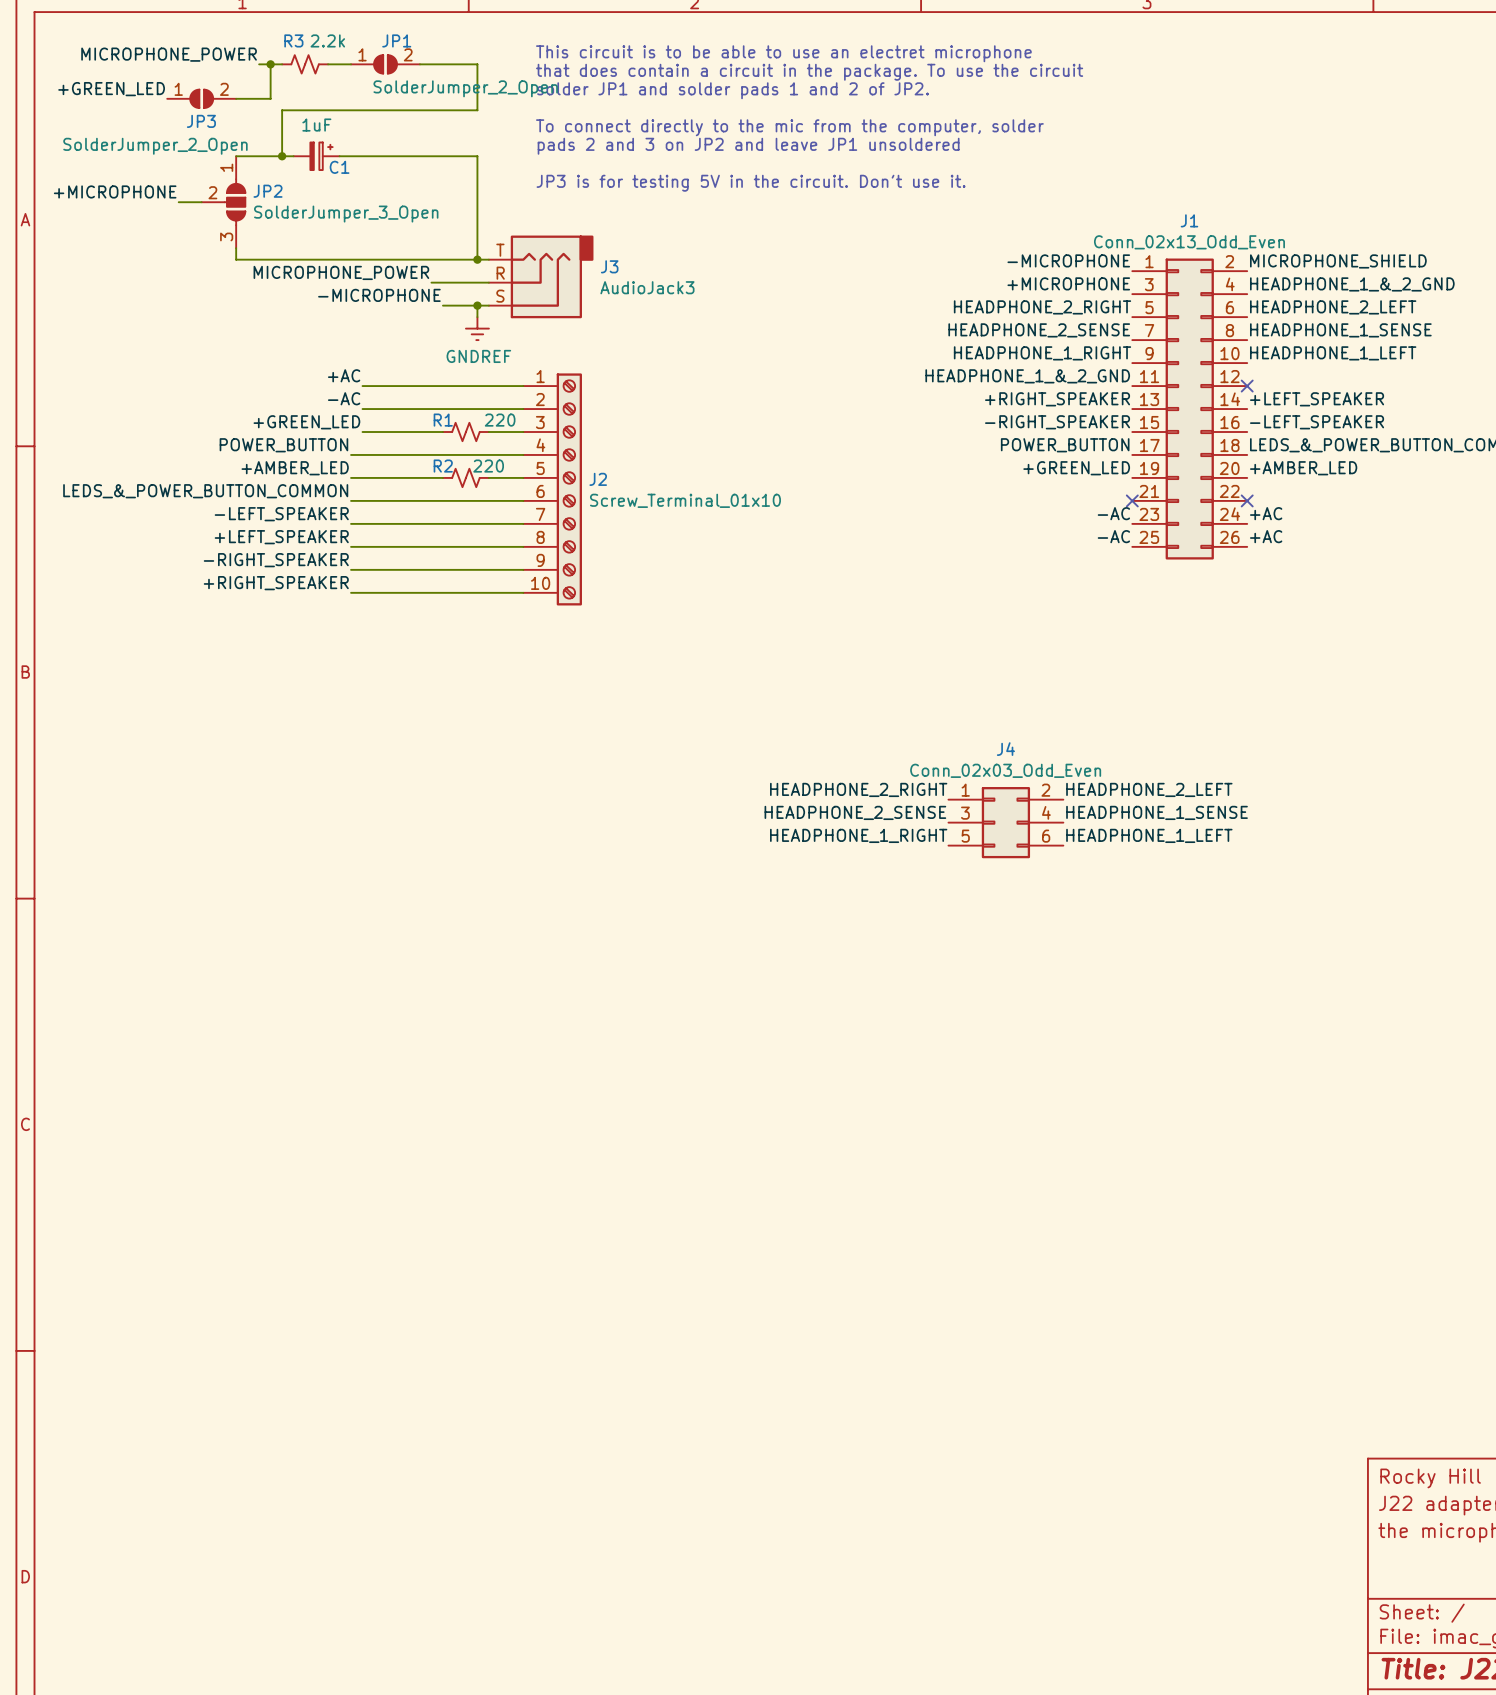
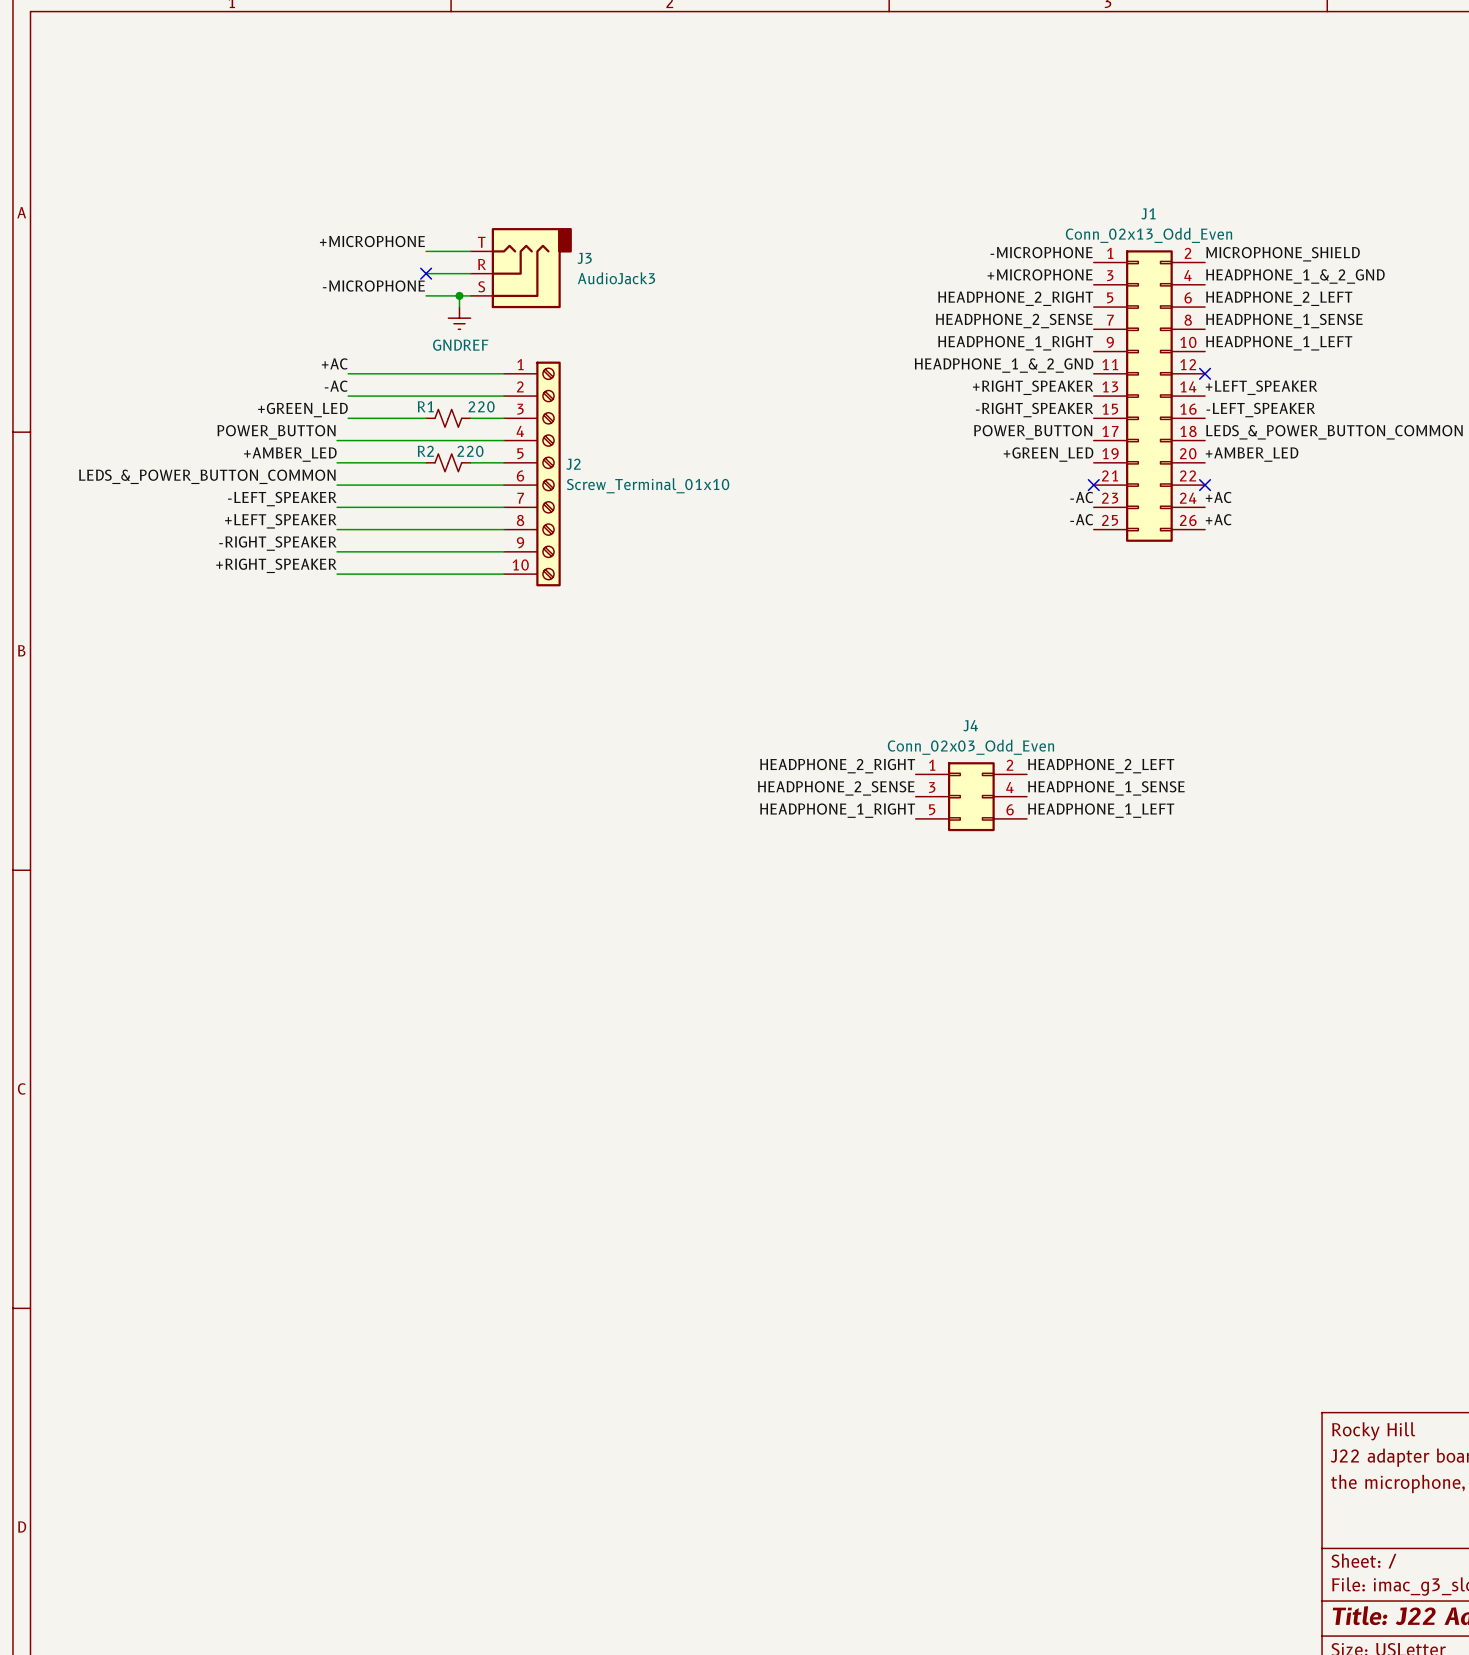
text: This circuit is to be able to use an electret microphone (783, 53) -> none
label: MICROPHONE_POWER (169, 54) -> none
wire: (259, 64) (282, 64) -> none
wire: (270, 64) (270, 98) (236, 98) -> none
junction: (270, 64) -> none
R3: 2.2k (305, 64) -> none
wire: (328, 64) (351, 64) -> none
JP1: SolderJumper_2_Open (385, 64) -> none
wire: (419, 64) (477, 64) (477, 110) (282, 110) (282, 156) -> none
text: that does contain a circuit in the package. To use the circuit (809, 72) -> none
label: +GREEN_LED (111, 89) -> none
text: solder JP1 and solder pads 1 and 2 of JP2. (733, 90) -> none
JP3: SolderJumper_2_Open (201, 98) -> none
text: To connect directly to the mic from the computer, solder (789, 127) -> none
text: pads 2 and 3 on JP2 and leave JP1 unsoldered (748, 146) -> none
wire: (236, 156) (293, 156) -> none
junction: (282, 156) -> none
C1: 1uF (316, 156) -> none
wire: (339, 156) (477, 156) (477, 259) -> none
text: JP3 is for testing 5V in the circuit. Don't use it. (751, 183) -> none
label: +MICROPHONE (115, 191) -> none
wire: (178, 202) (201, 202) -> none
JP2: SolderJumper_3_Open (223, 202) -> none
wire: (236, 248) (236, 259) (442, 259) -> none
junction: (477, 259) -> none
label: MICROPHONE_POWER (341, 272) -> +MICROPHONE (372, 241)
wire: (431, 282) (442, 282) -> none
no-connect mark: none -> (426, 273)

